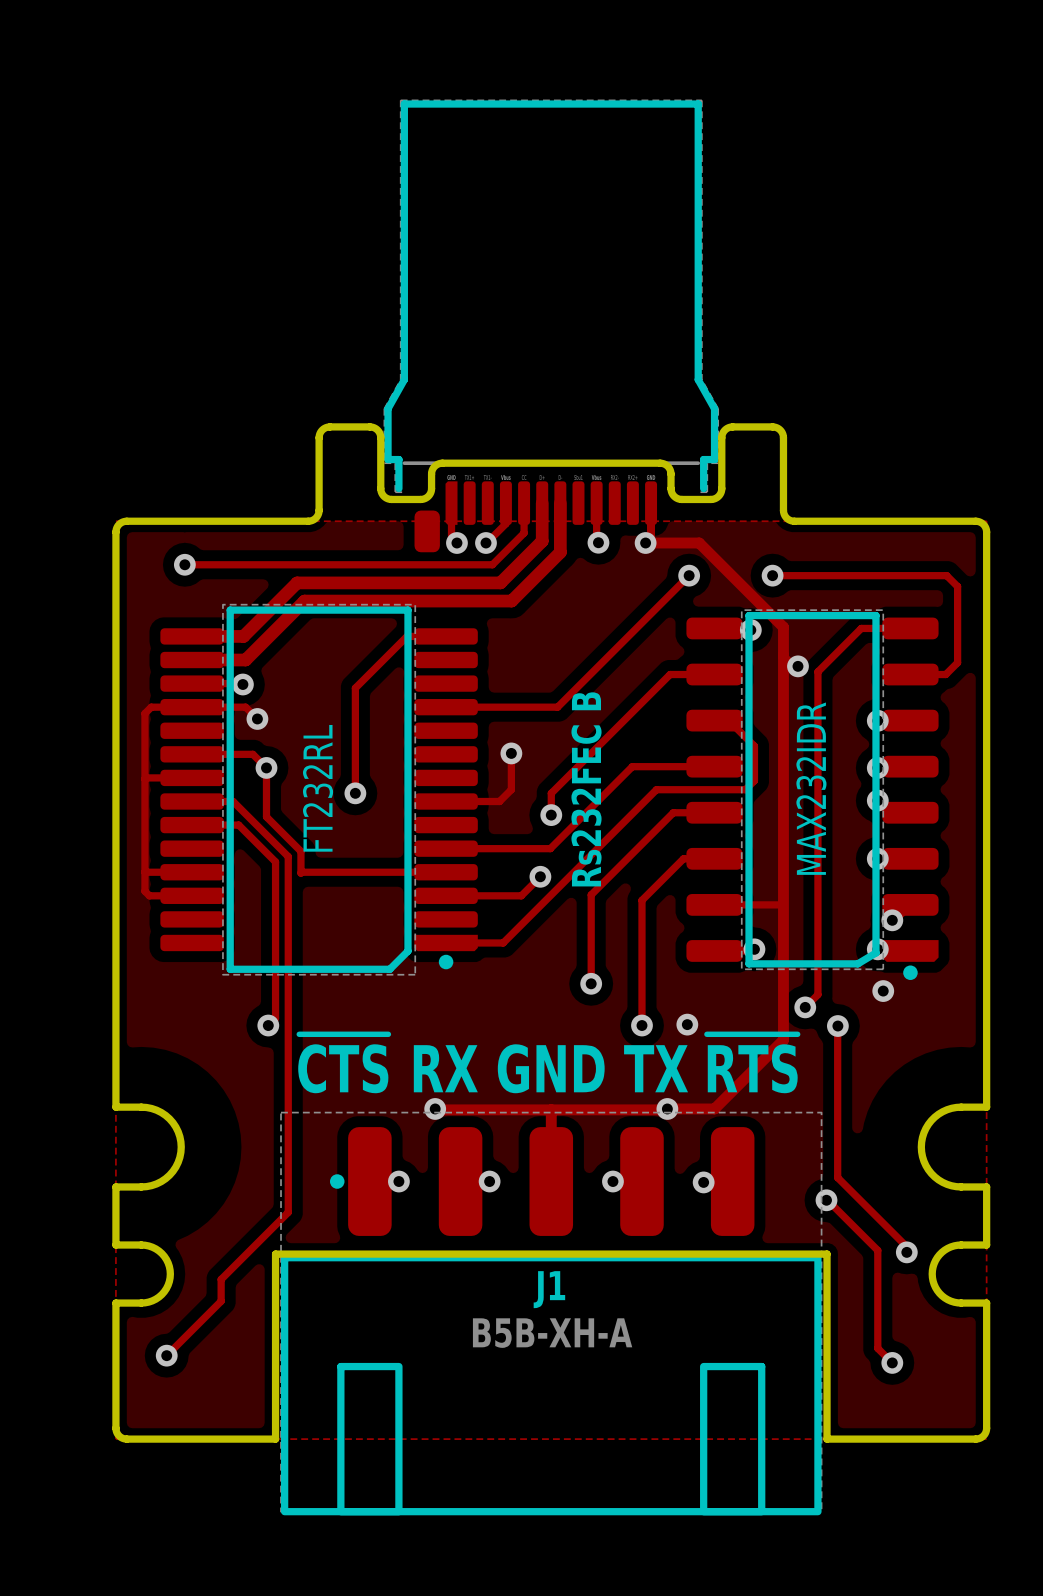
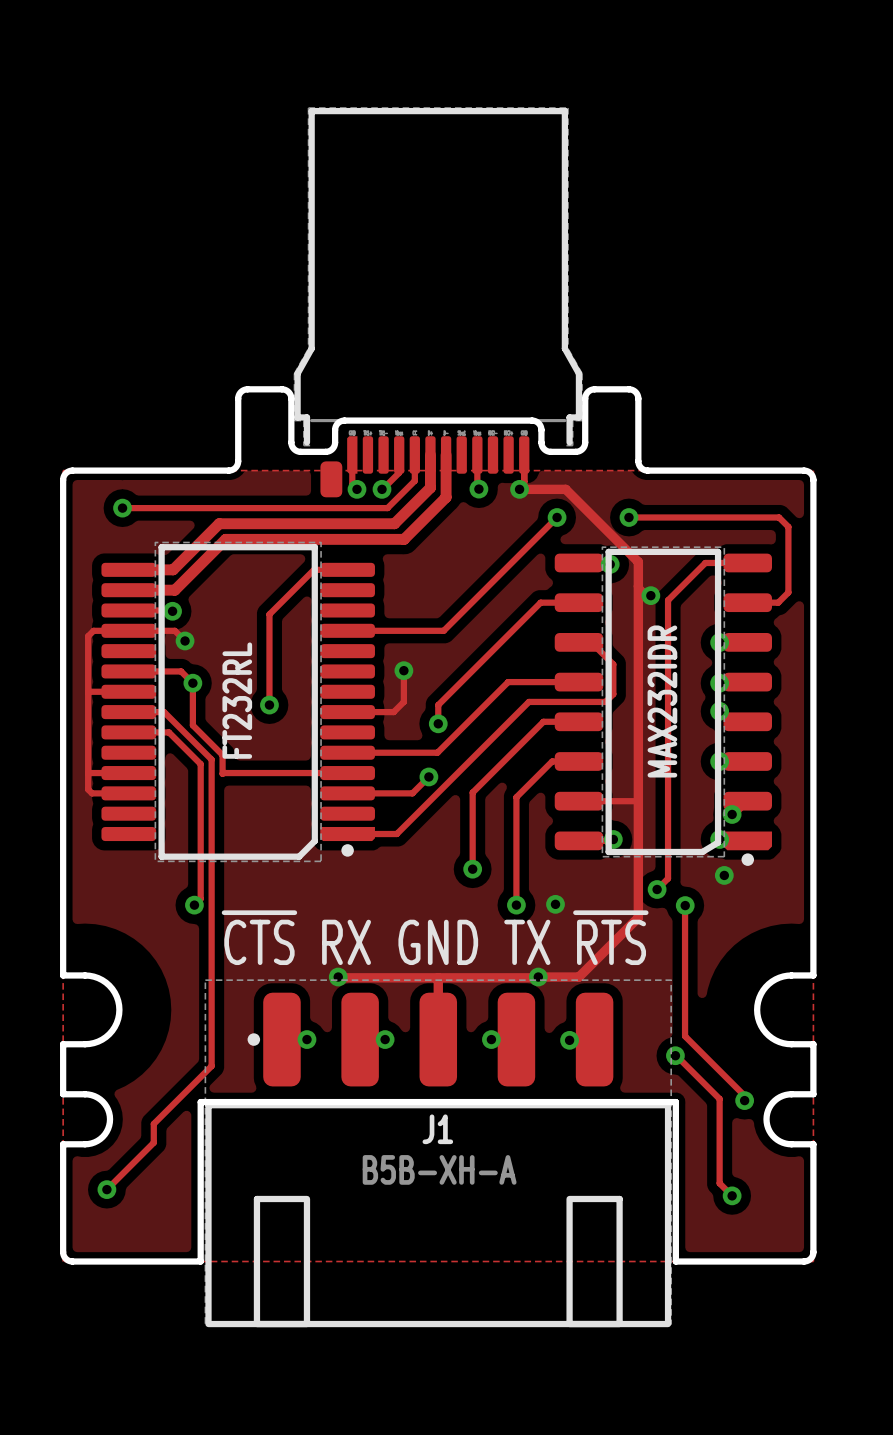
text: Rs232FEC B (586, 789) -> none

